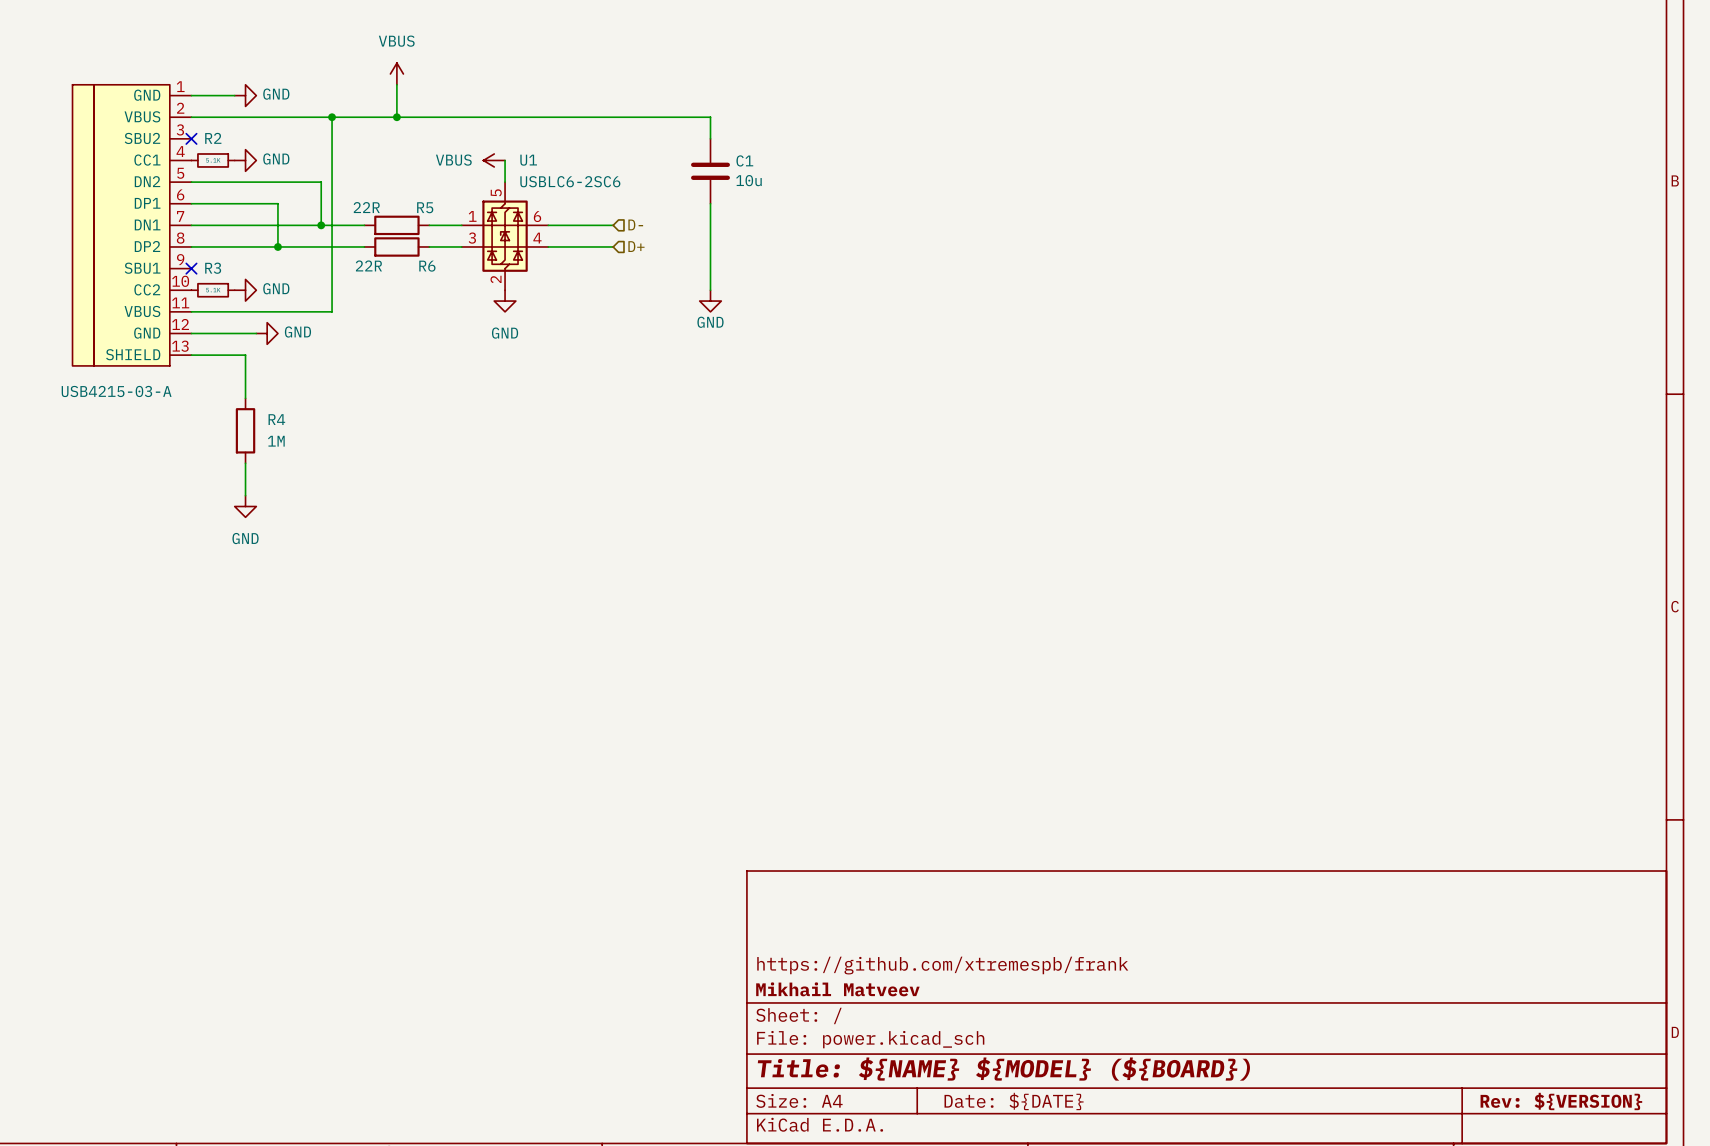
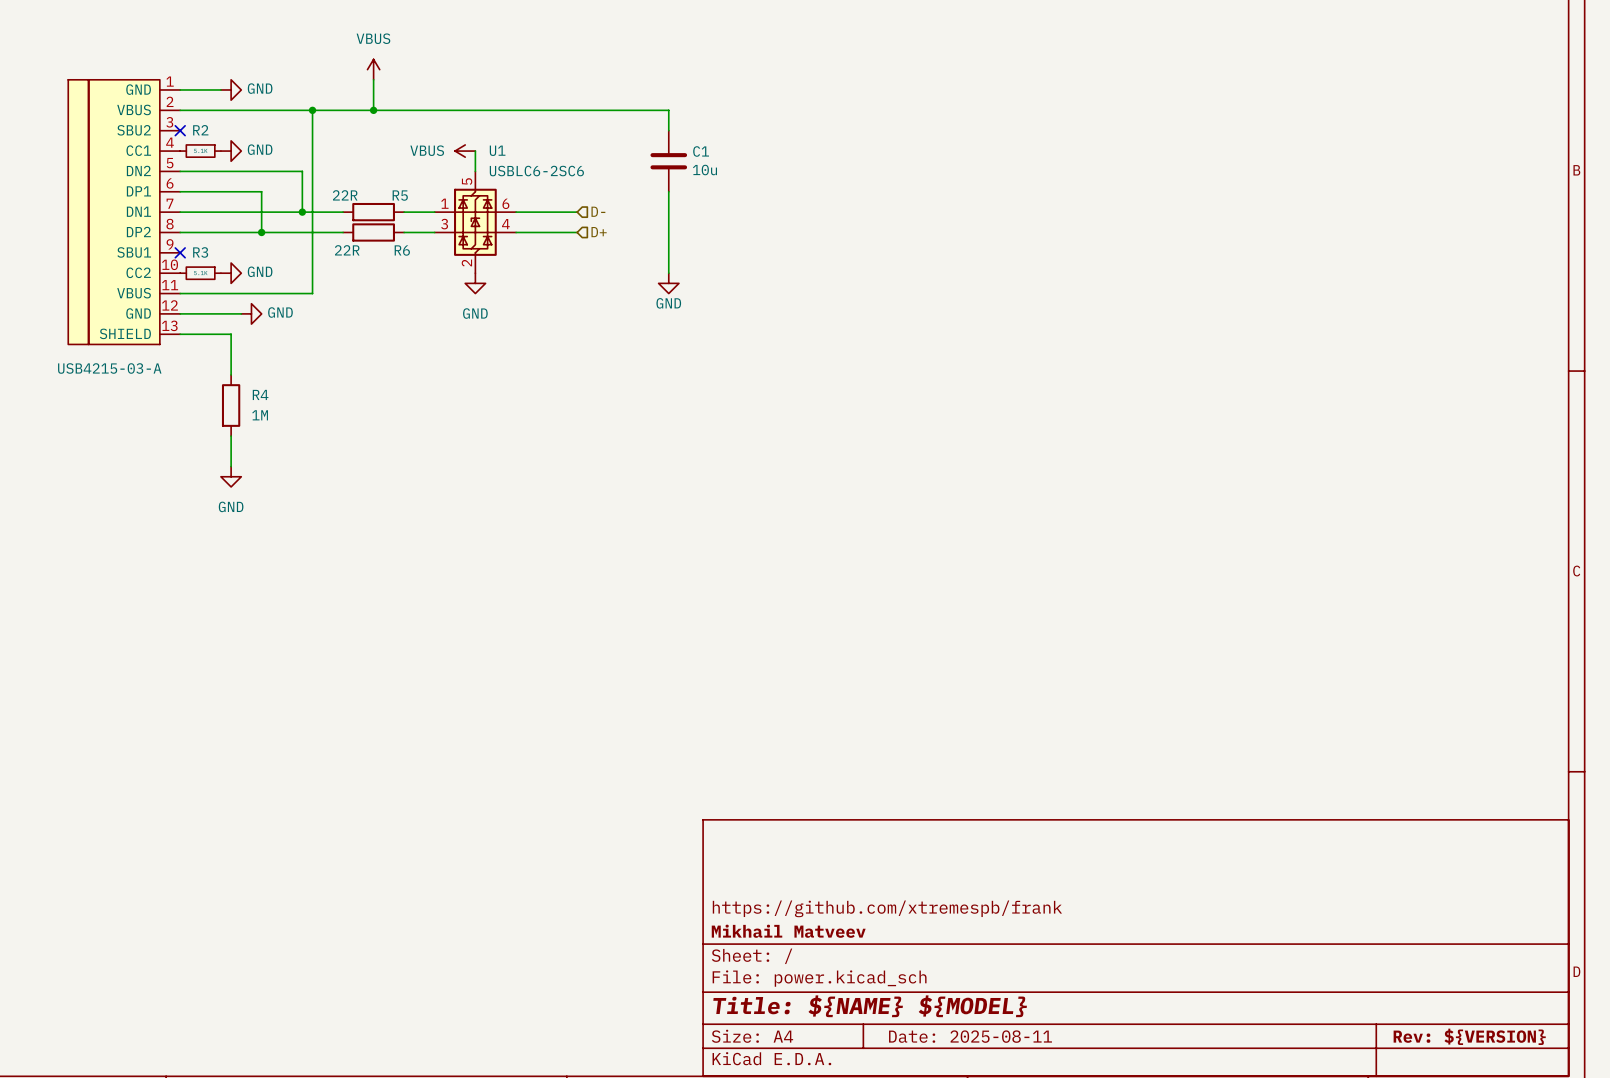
title block: Title: ${NAME} ${MODEL} (${BOARD}) (1003, 1069) -> Title: ${NAME} ${MODEL} (870, 1006)
title block: Date: ${DATE} (1014, 1101) -> Date: 2025-08-11 (970, 1036)

